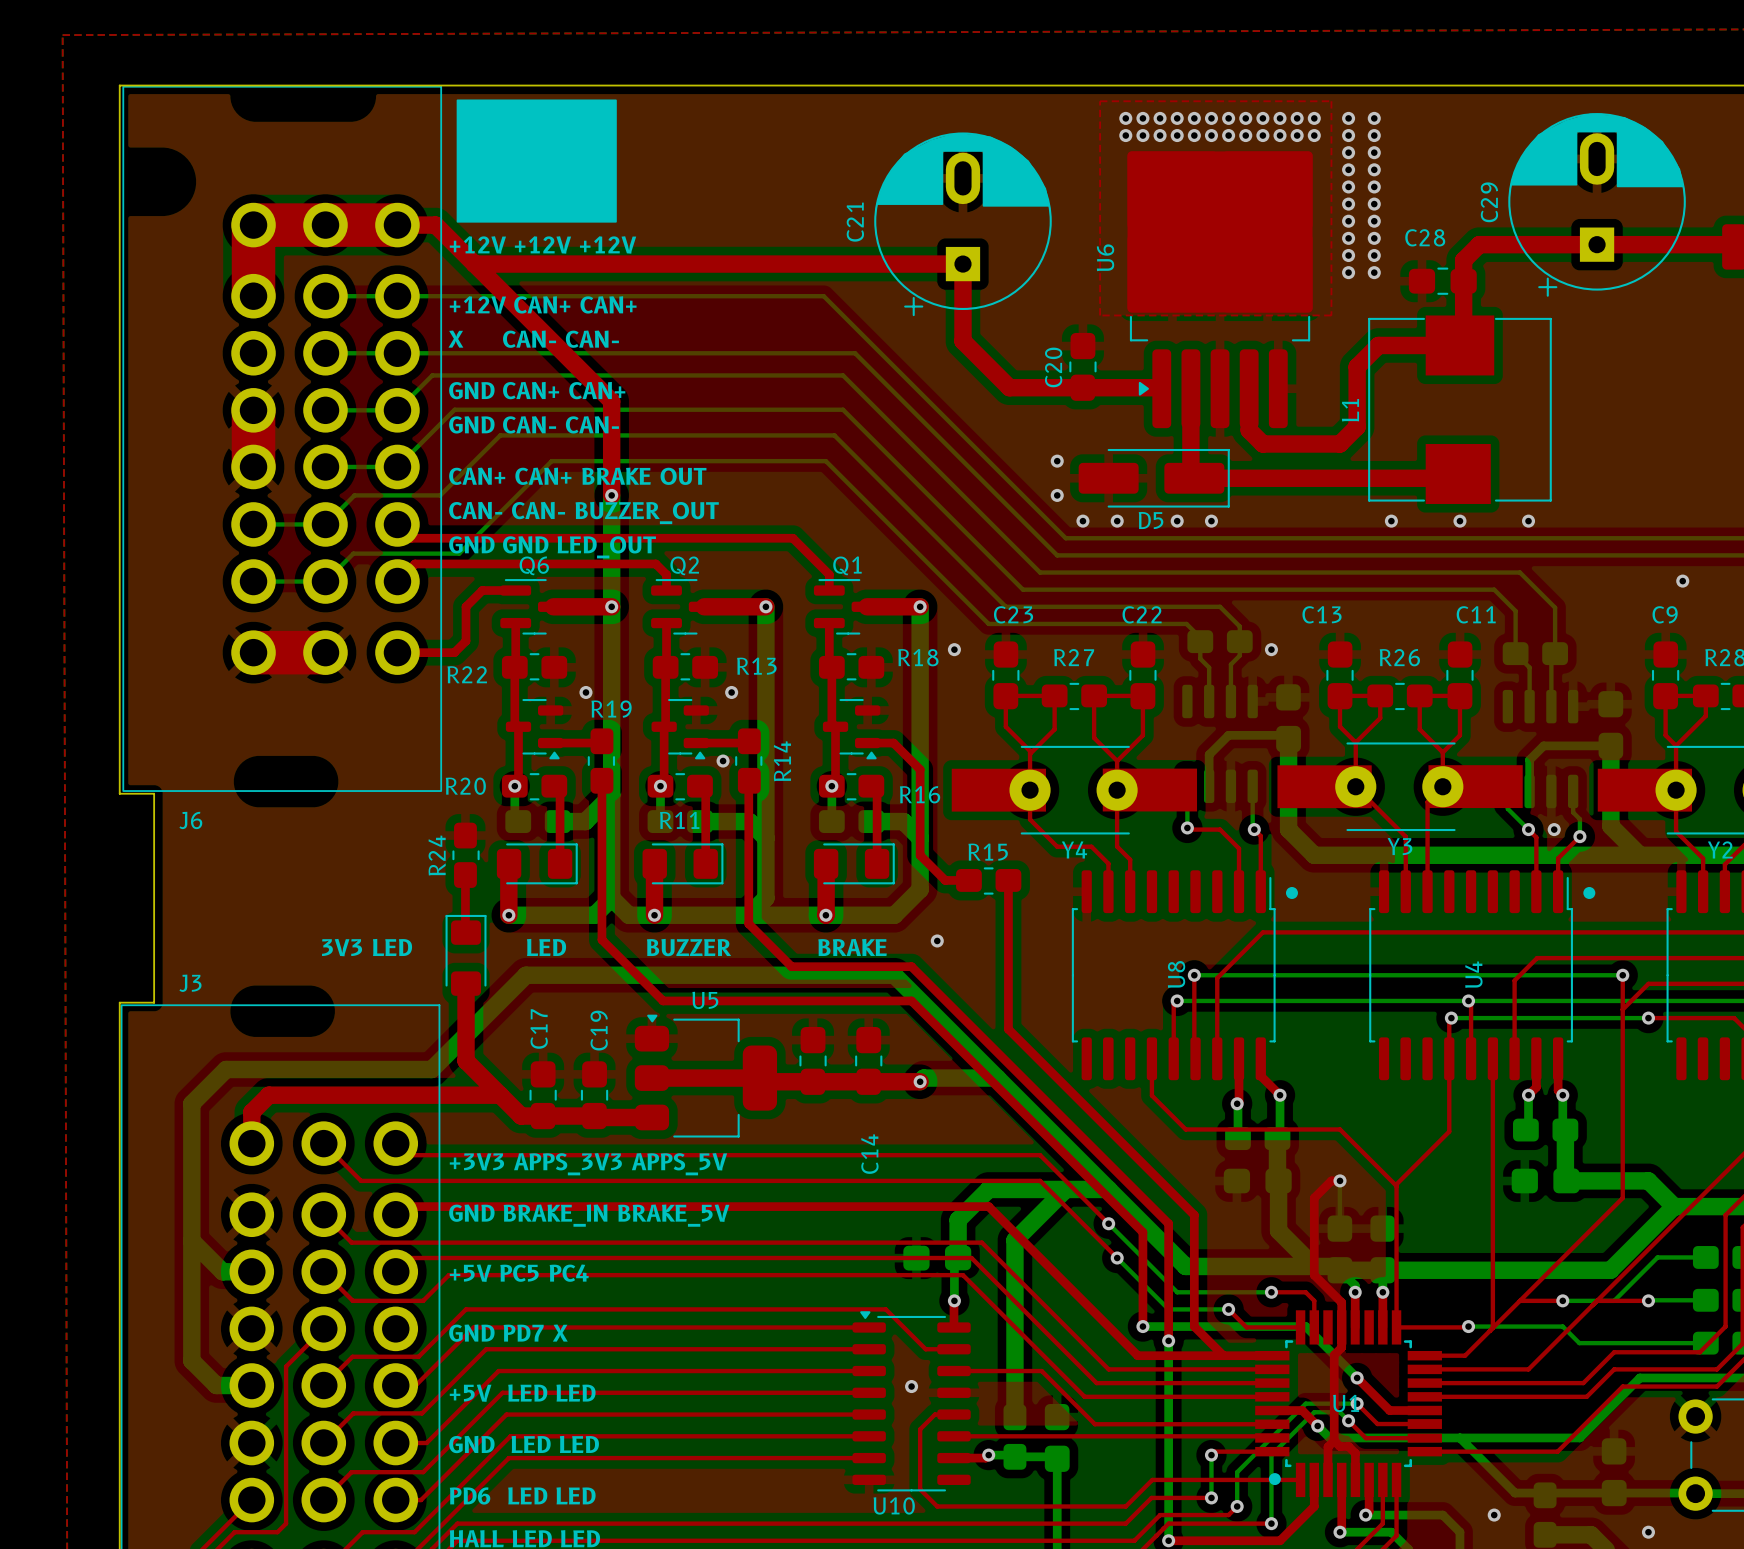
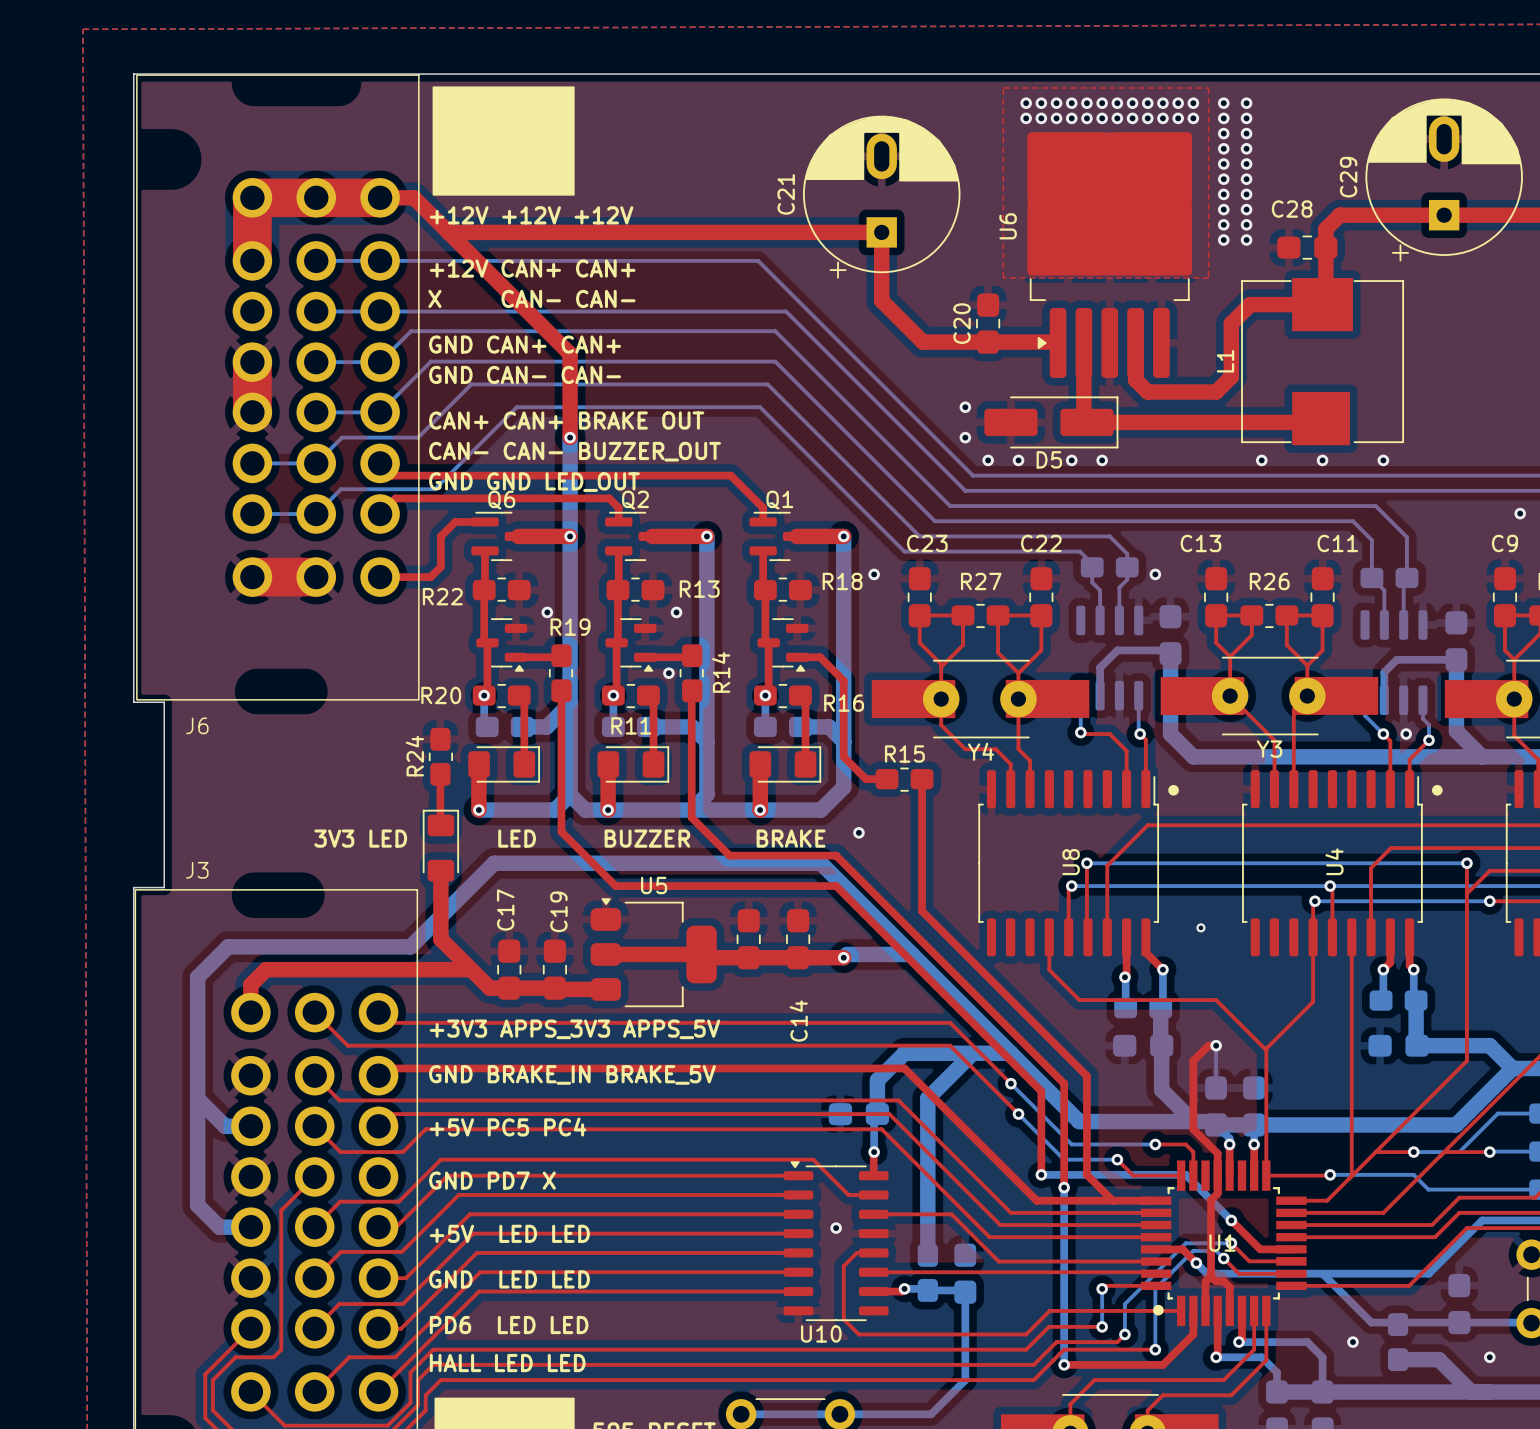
via: none -> (1200, 927)

